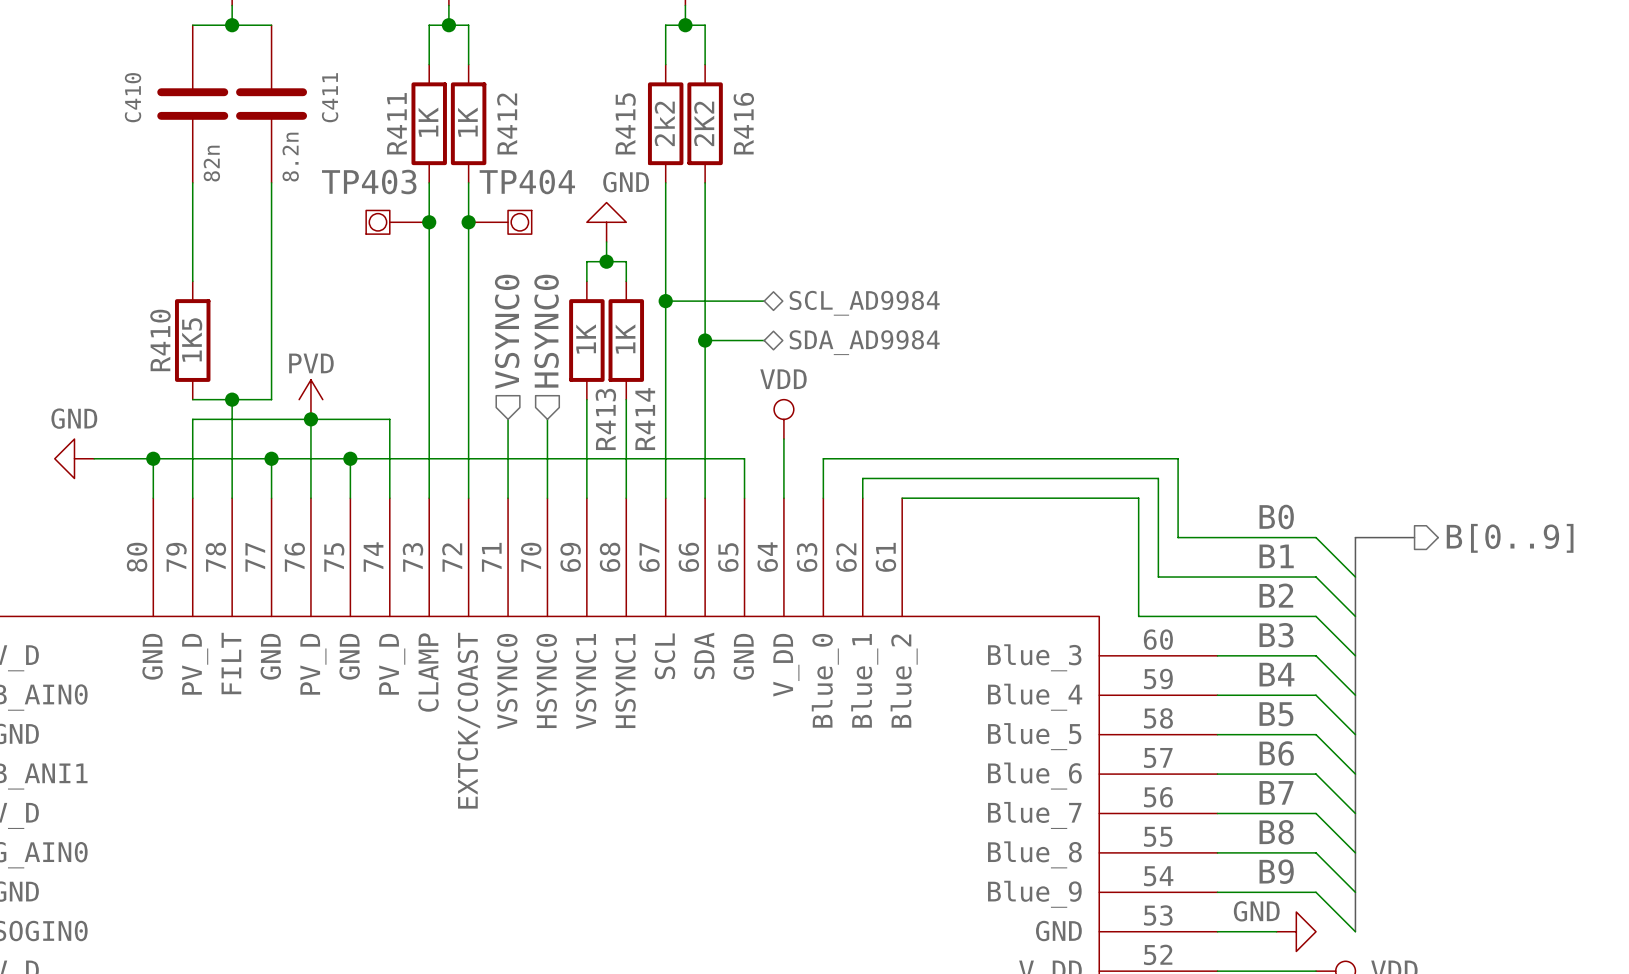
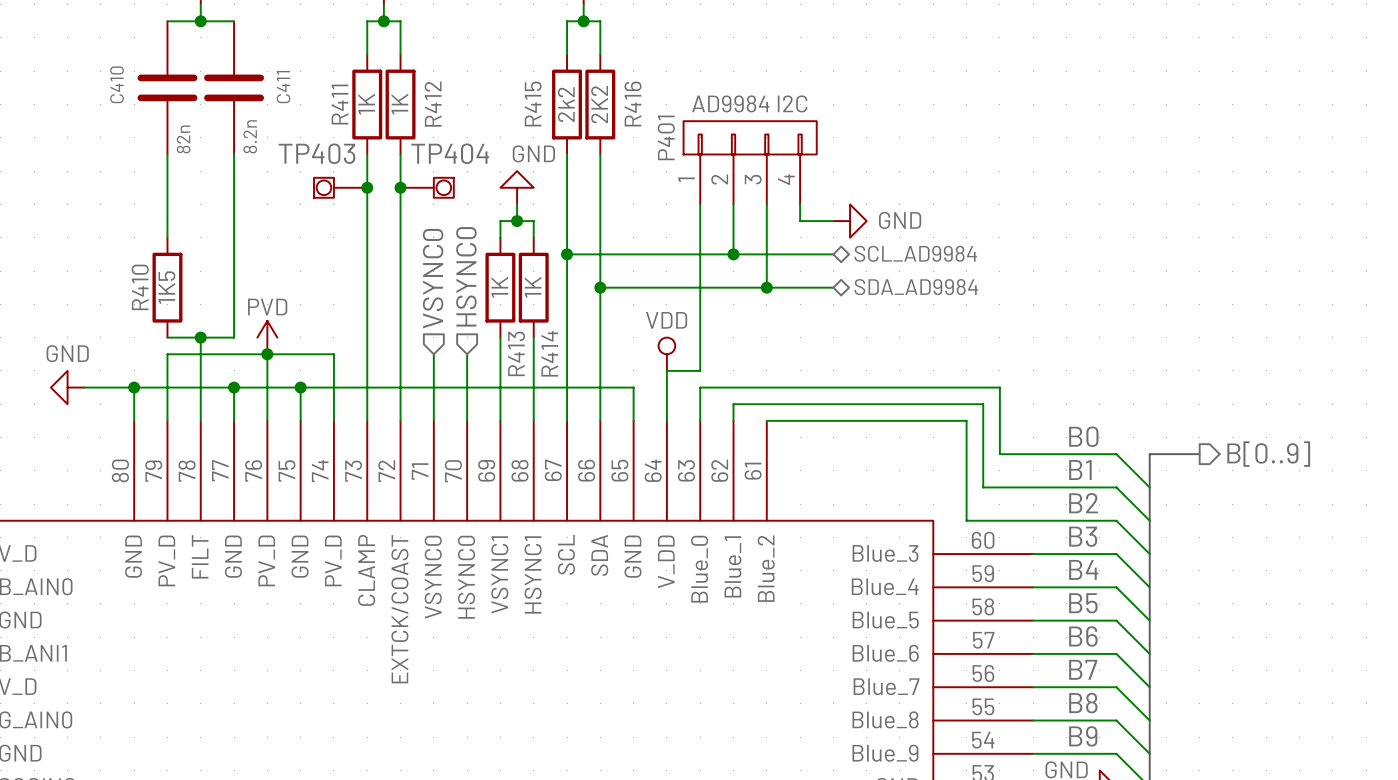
P401: none -> AD9984 I2C (750, 162)
wire: none -> (700, 204) (700, 370) (666, 370)
wire: none -> (733, 204) (733, 254)
wire: none -> (766, 204) (766, 287)
wire: none -> (800, 204) (800, 221) (833, 221)
power symbol: none -> GND (850, 221)
wire: none -> (650, 254) (833, 254)
junction: none -> (733, 254)
hierarchical label position: SCL_AD9984 (864, 303) -> SCL_AD9984 (915, 253)
wire: none -> (650, 287) (833, 287)
junction: none -> (766, 287)
hierarchical label position: SDA_AD9984 (864, 342) -> SDA_AD9984 (916, 287)

